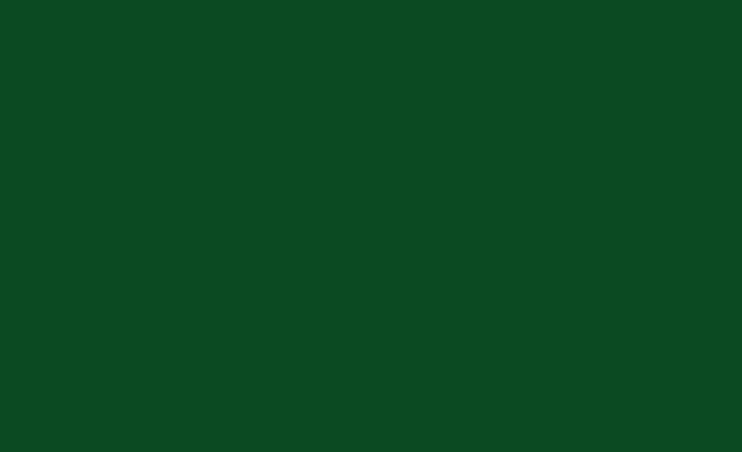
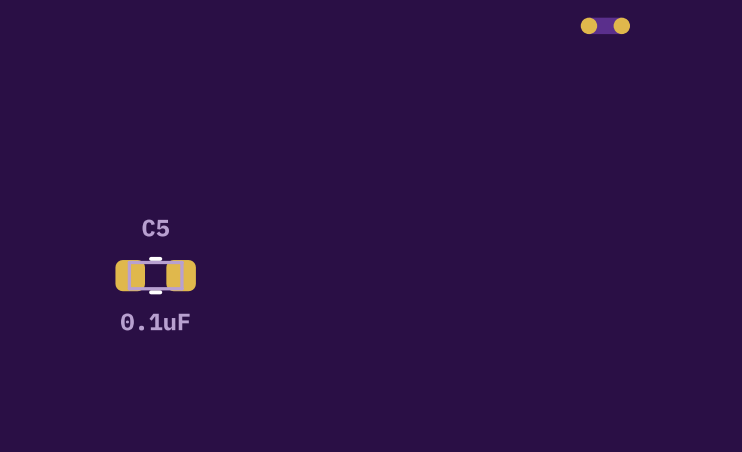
part: none -> (605, 25)
C5: none -> 0.1uF (155, 275)

